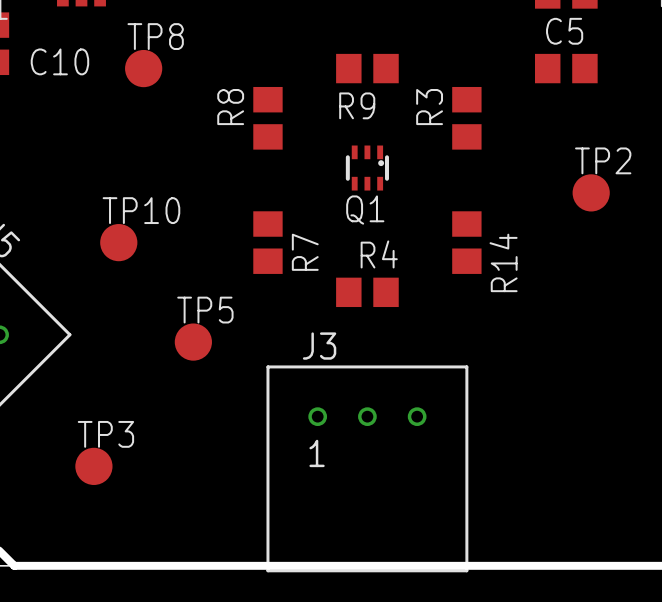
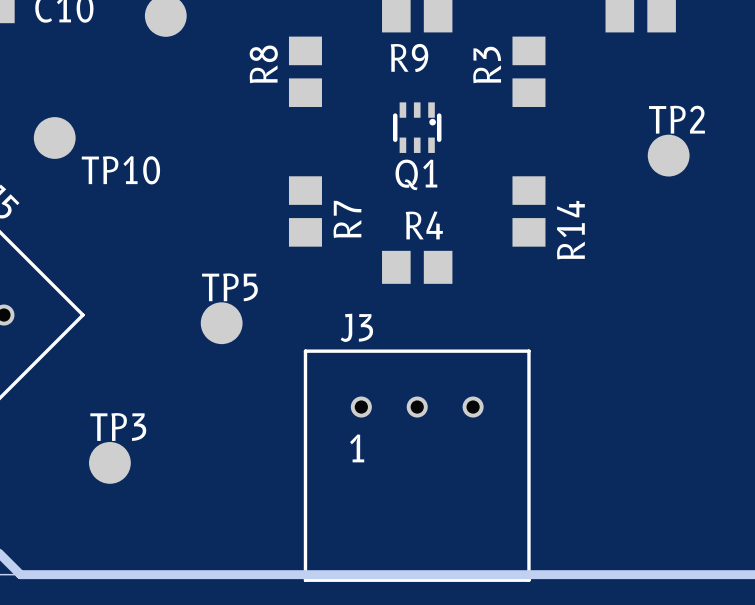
TP10 name position: TP10 (141, 210) -> TP10 (120, 170)
TP10 position: (118, 242) -> (54, 138)

